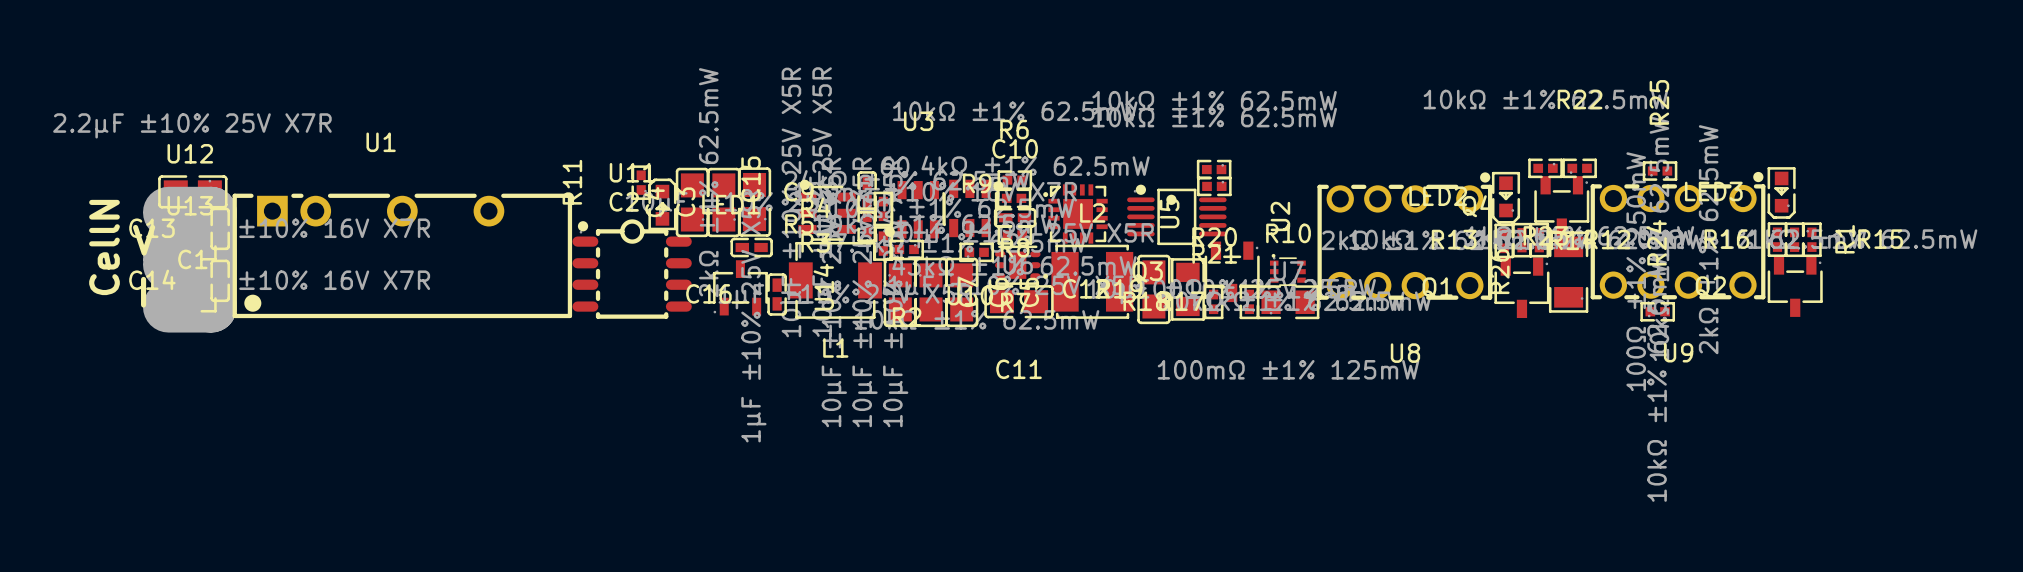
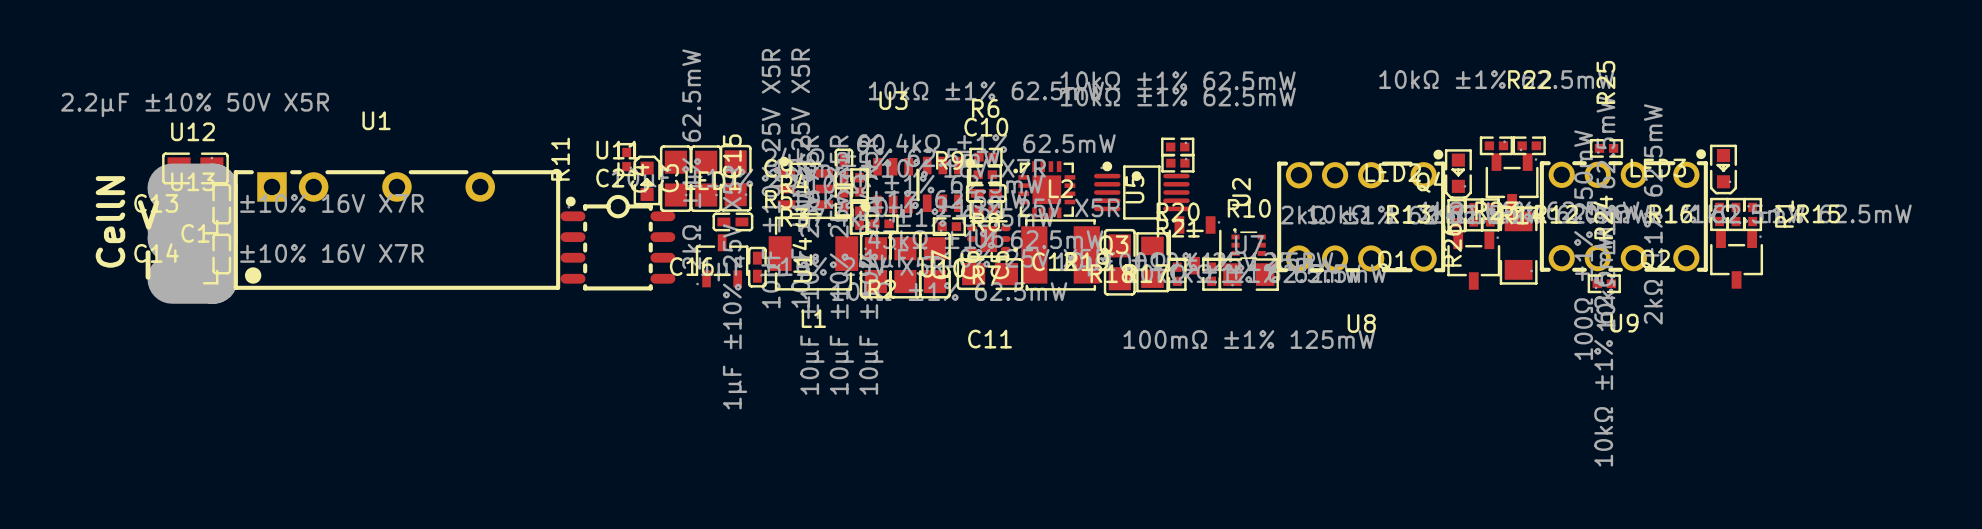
part value: 2.2µF ±10% 25V X7R (192, 125) -> 2.2µF ±10% 50V X5R (195, 104)

